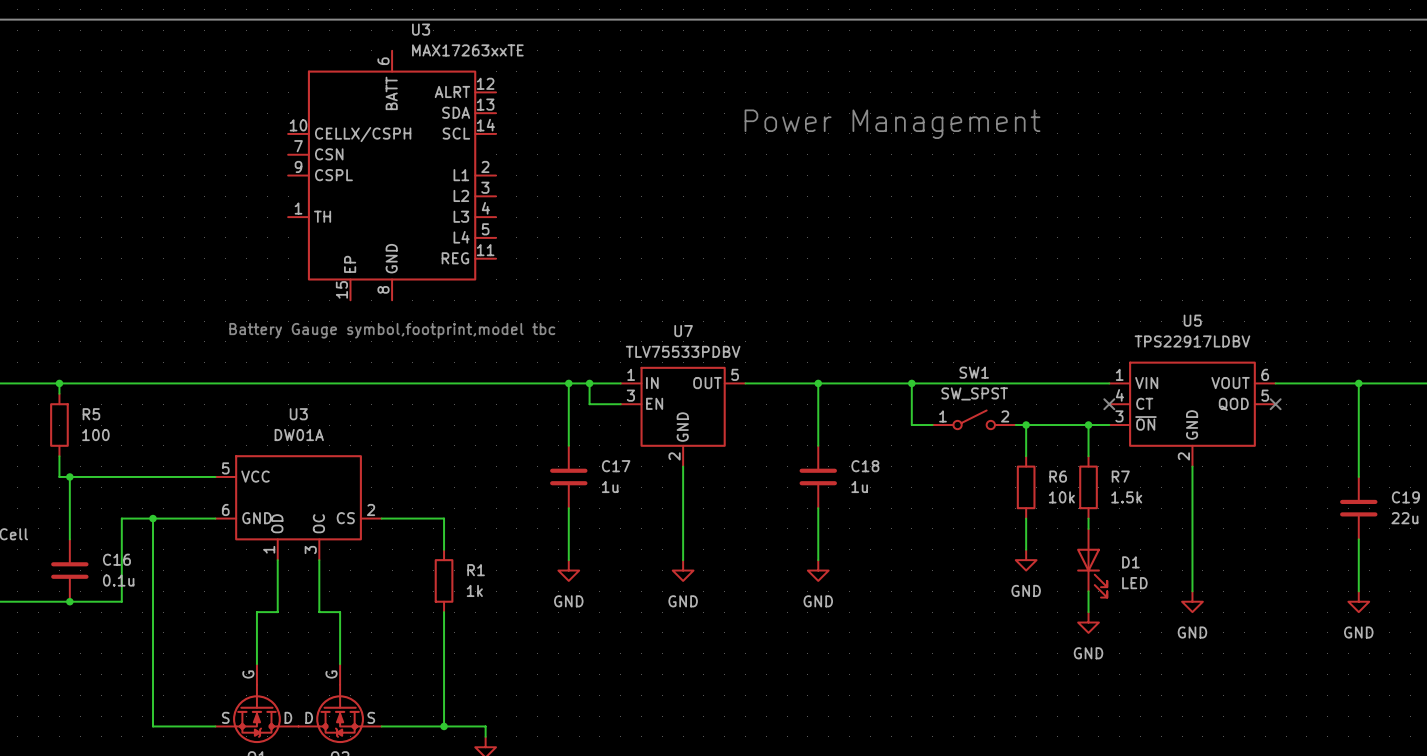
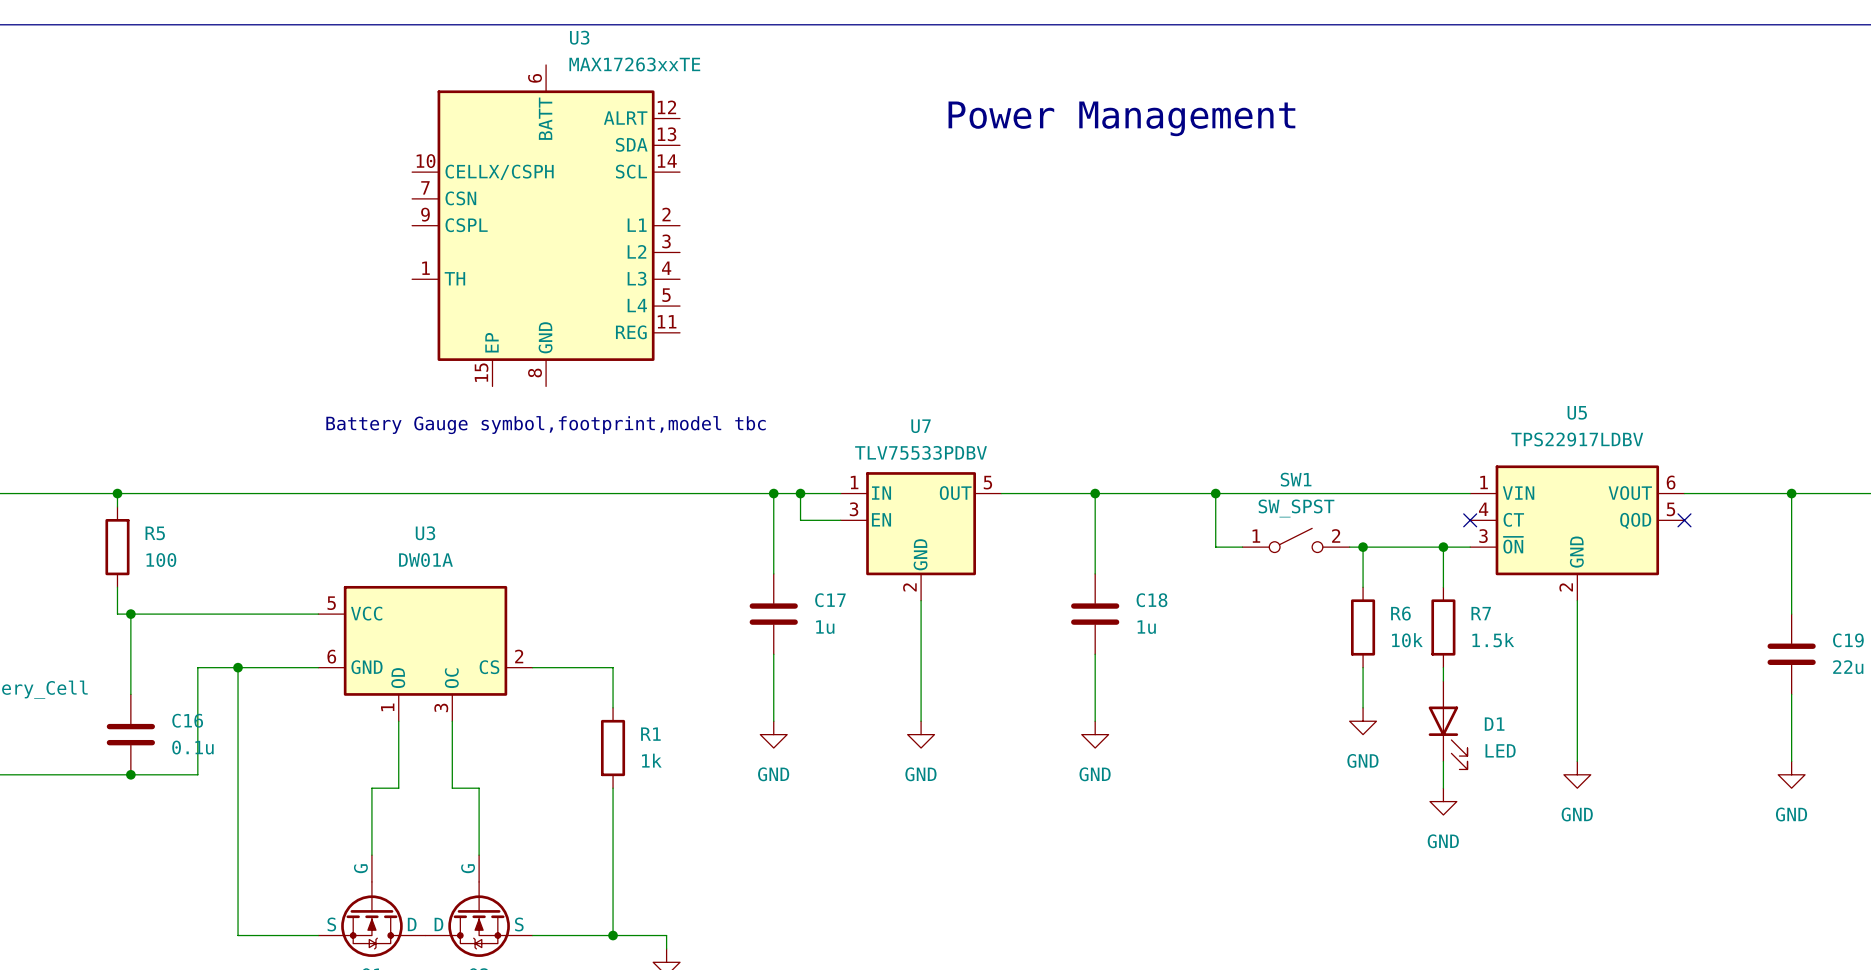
text position: Power Management (892, 124) -> Power Management (1121, 118)

